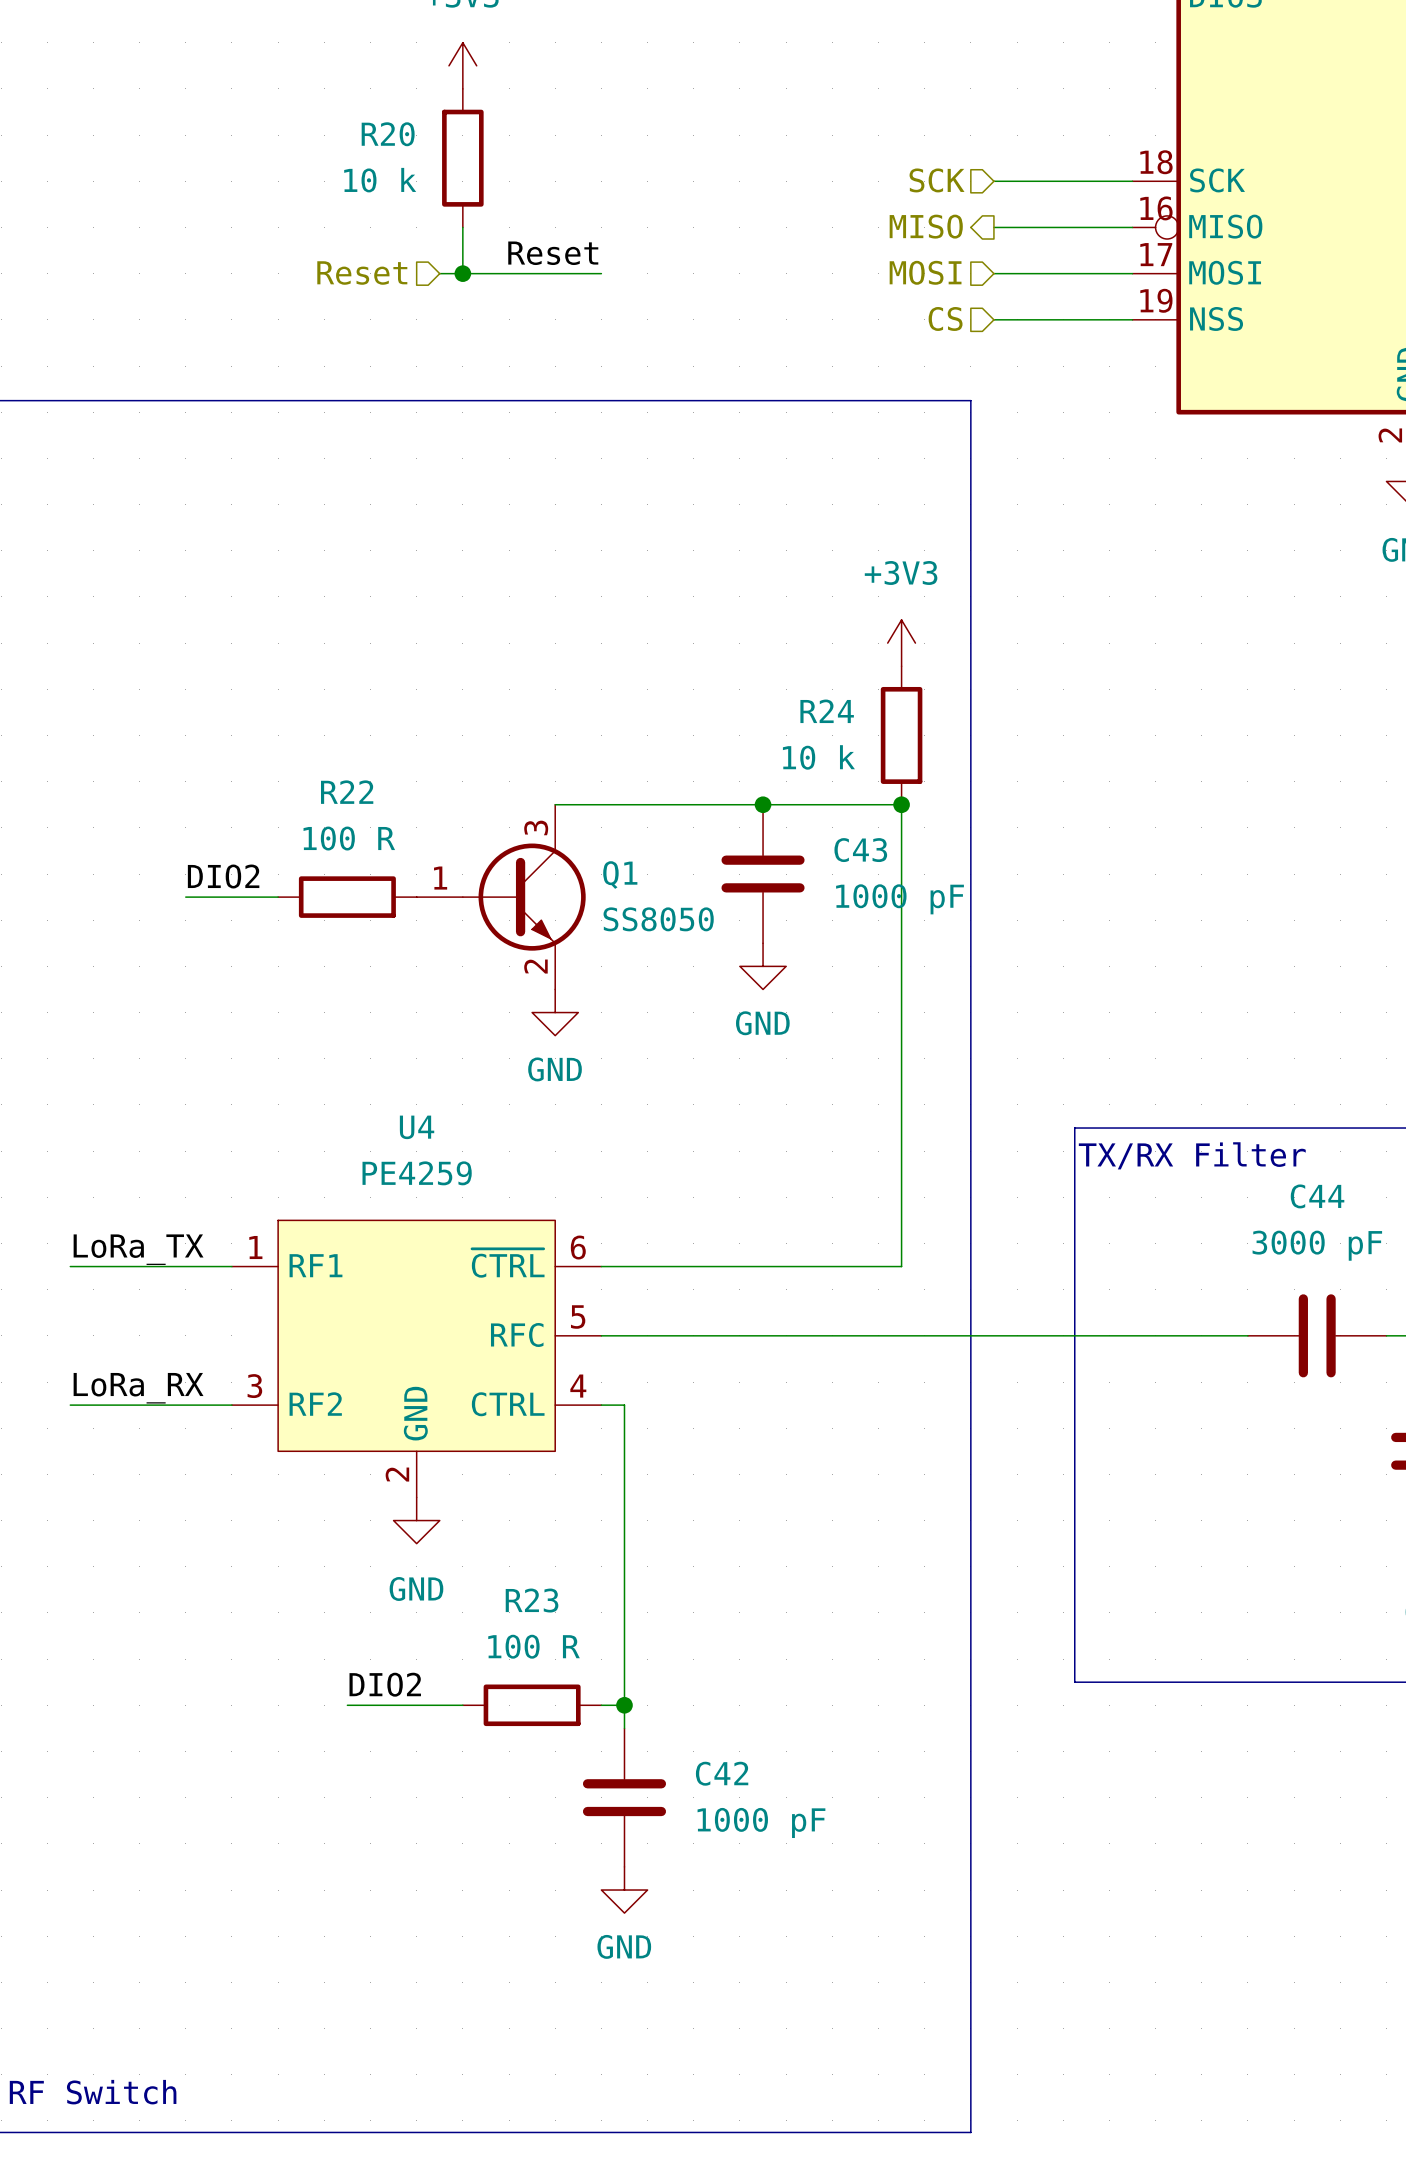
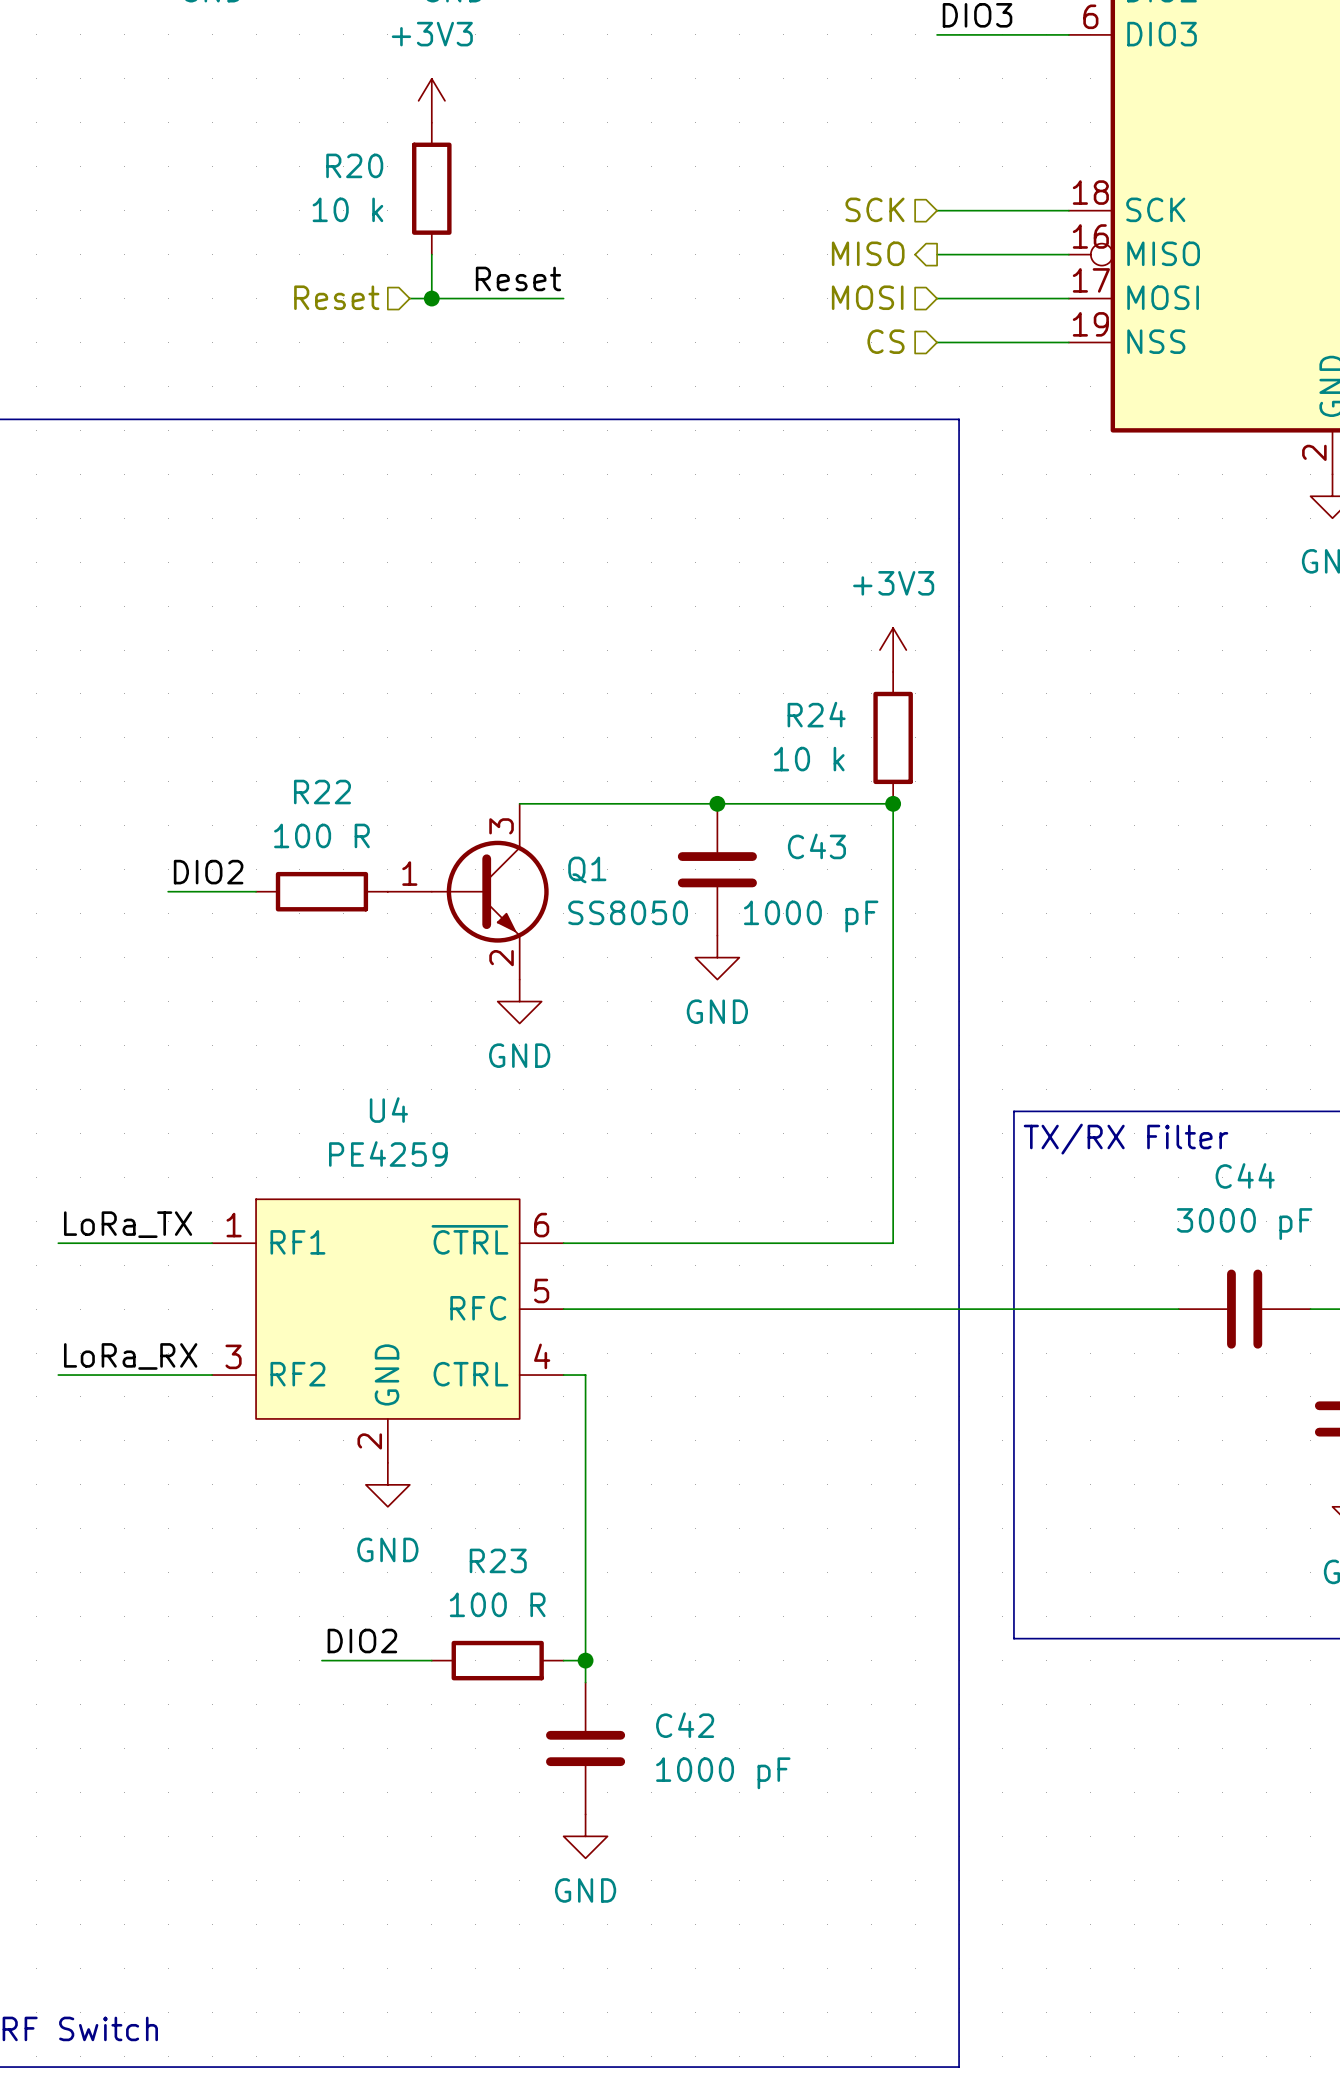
line: (970, 400) (970, 2132) -> (915, 419) (959, 419) (959, 2067) (915, 2067)
power symbol position: +3V3 (901, 643) -> +3V3 (893, 650)
R24 position: (901, 735) -> (893, 737)
wire: (901, 804) (901, 1266) -> (849, 803) (893, 803) (893, 1243) (849, 1243)
junction position: (901, 804) -> (893, 803)
C43 value position: 1000 pF (900, 899) -> 1000 pF (811, 916)

